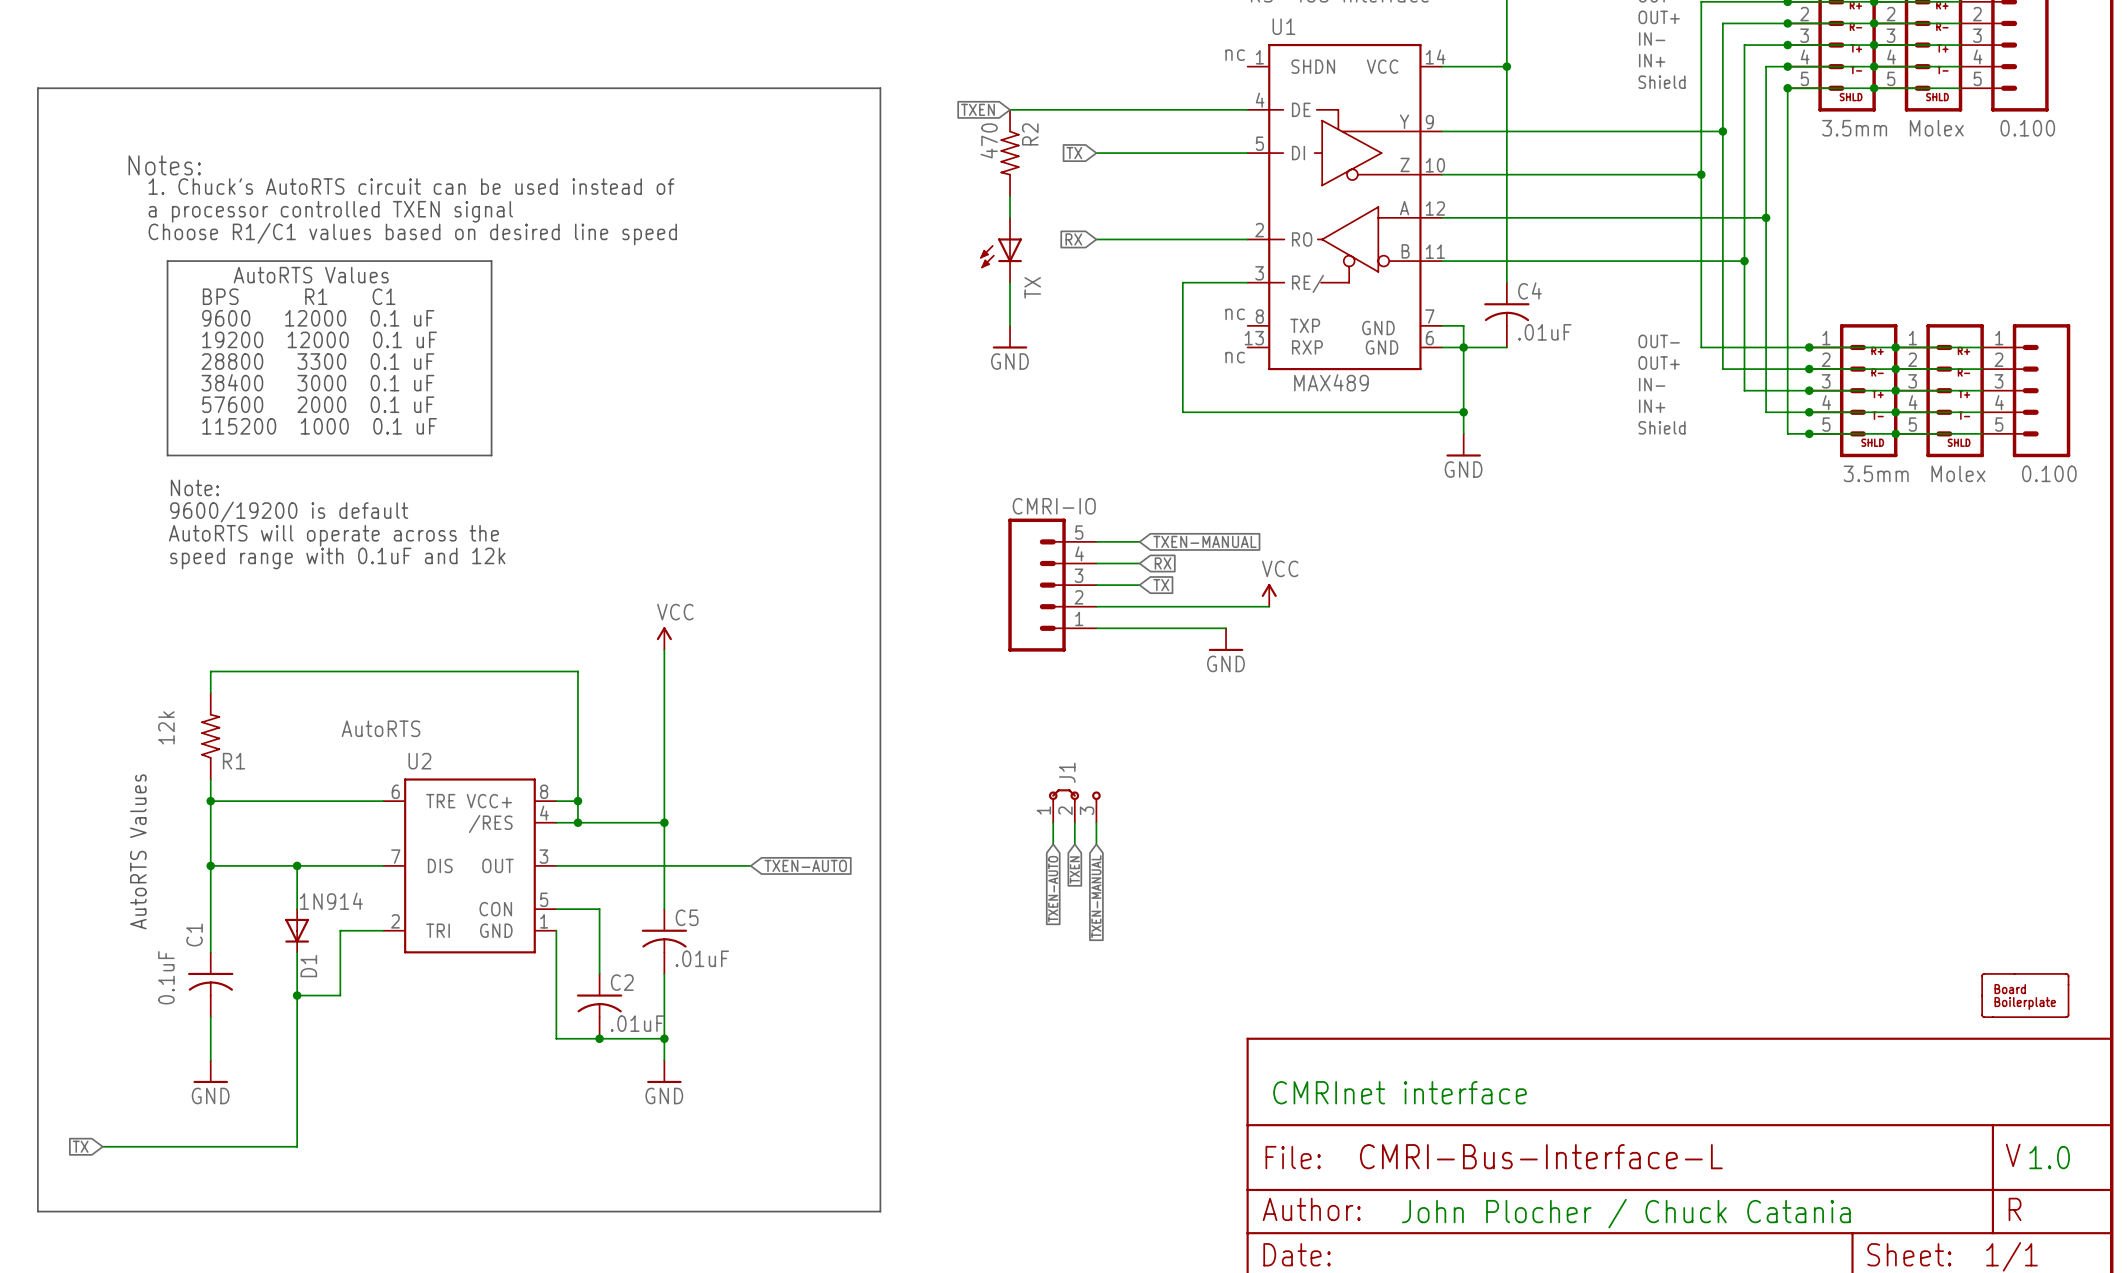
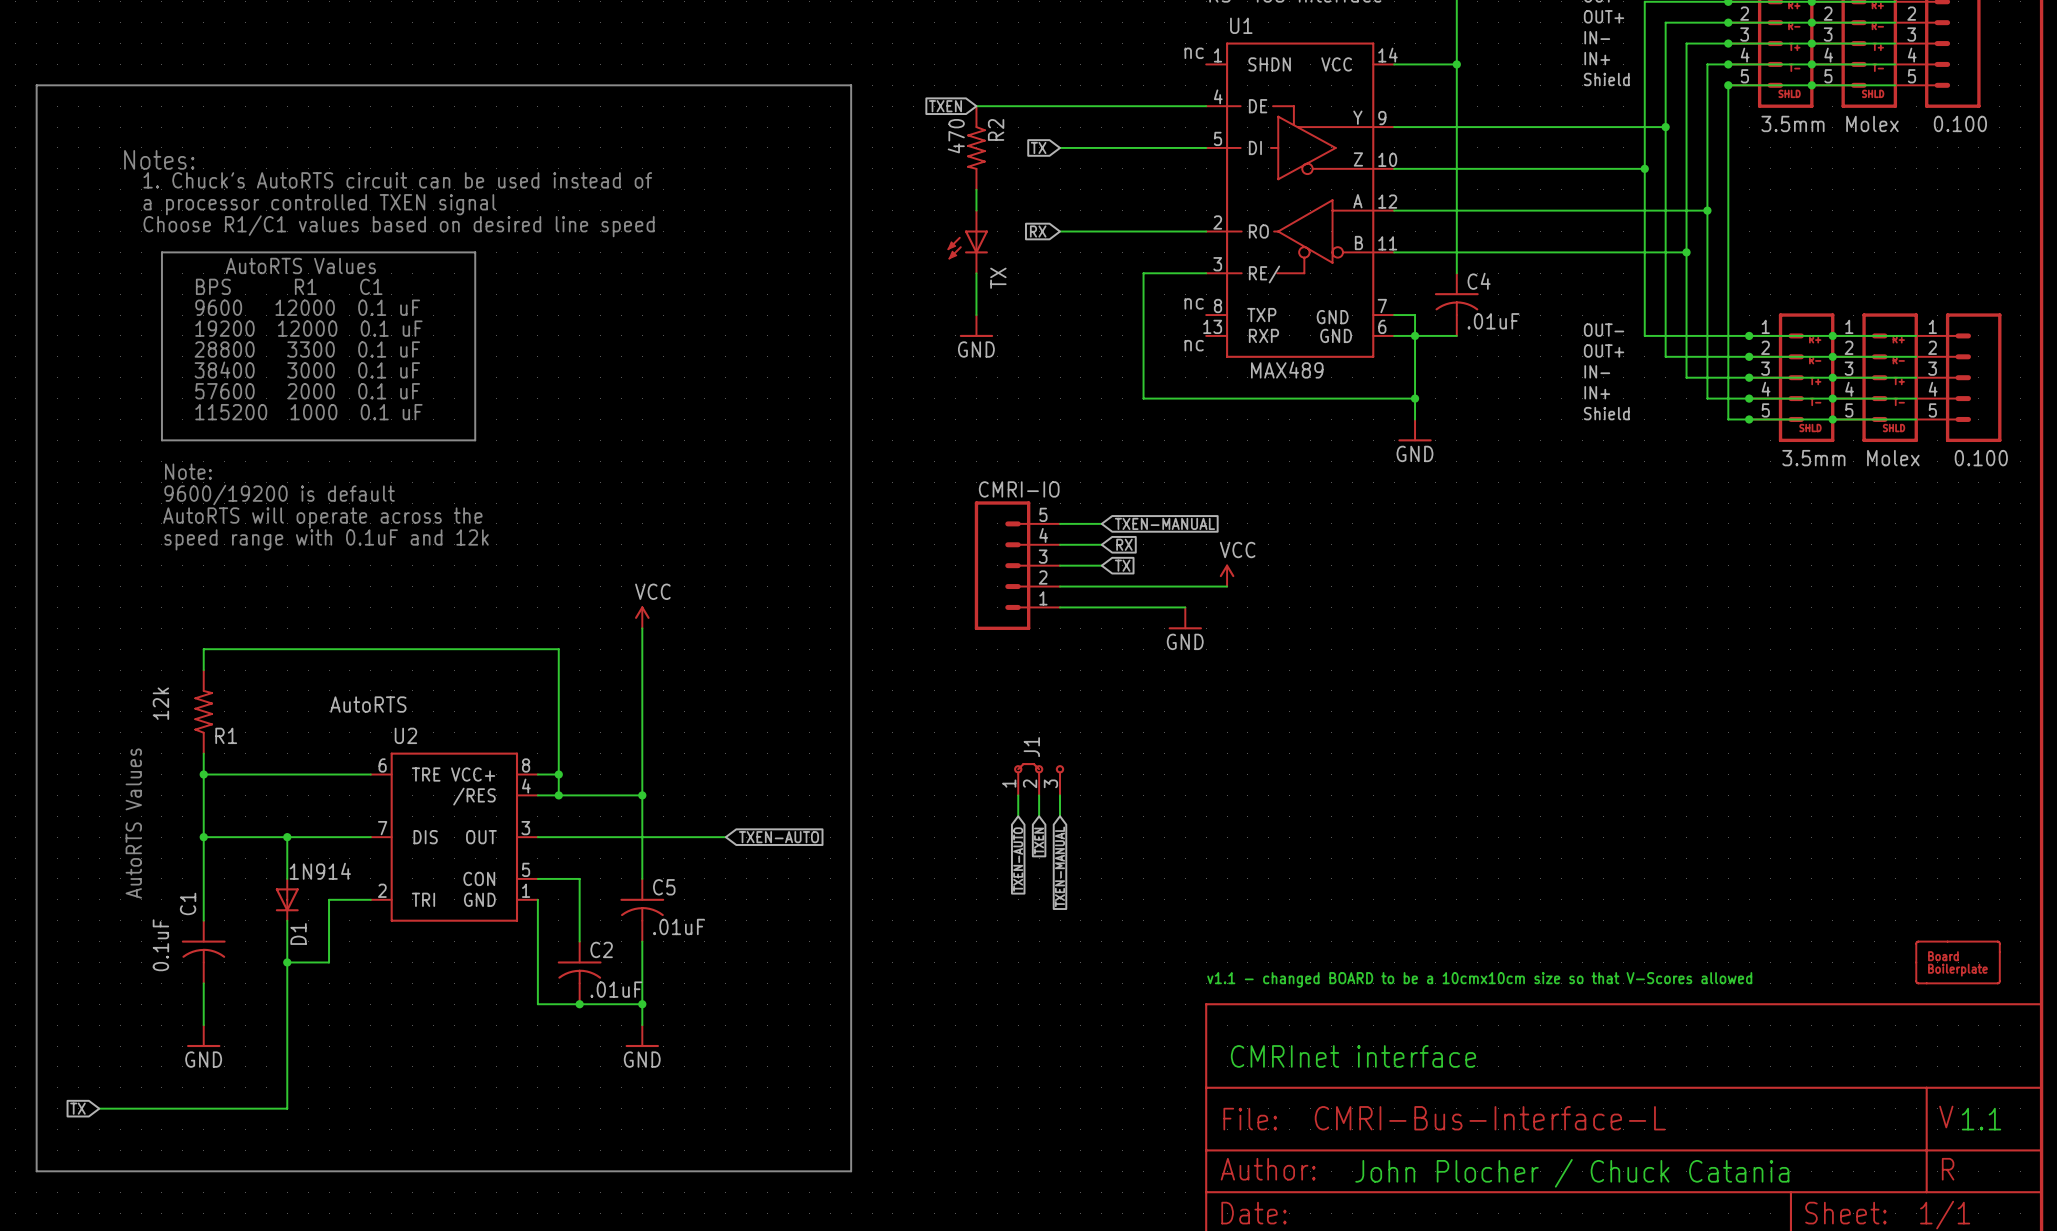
text: none -> v1.1 - changed BOARD to be a 10cmx10cm size so that V-Scores allowed (1479, 979)
text: 1.0 (2049, 1157) -> 1.1 (1981, 1119)

